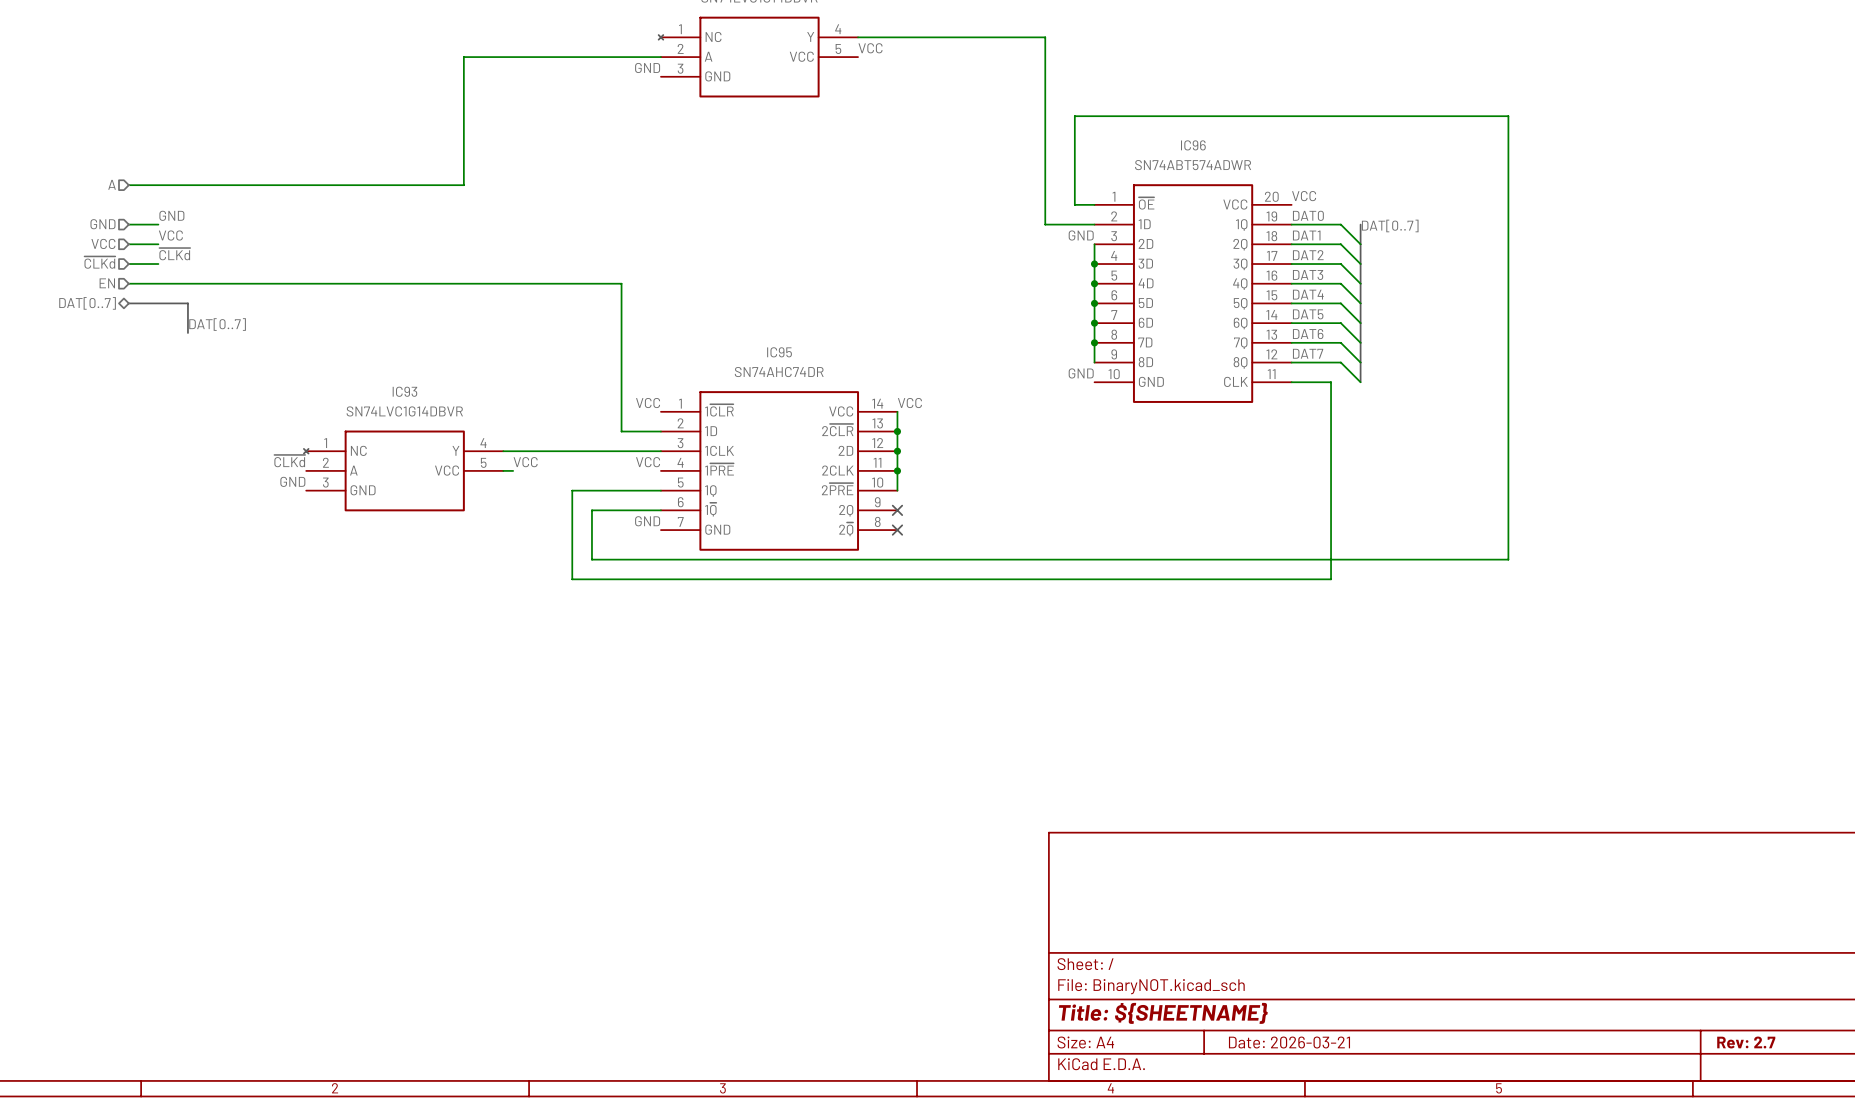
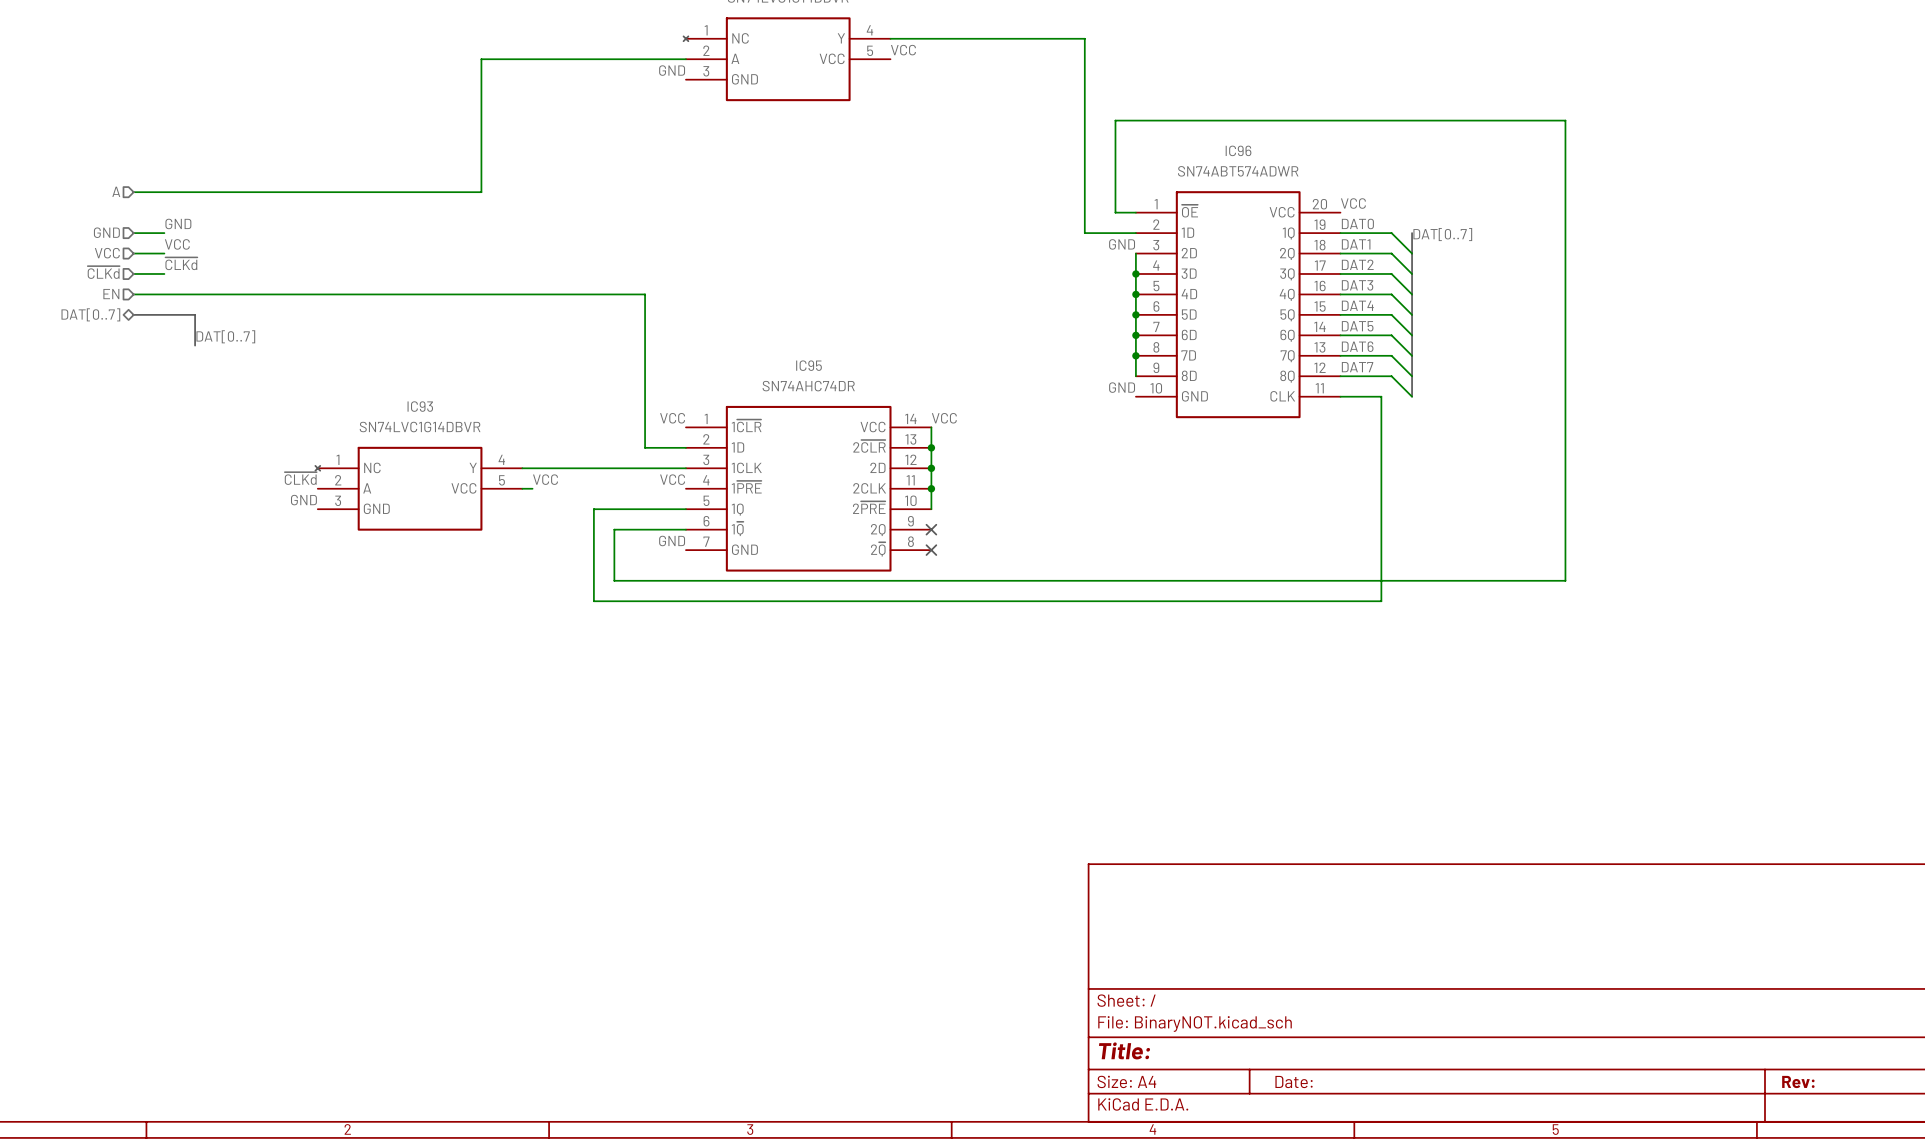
title block: Title: ${SHEETNAME} (1163, 1013) -> Title: (1124, 1050)
title block: Date: 2026-03-21 (1289, 1042) -> Date: (1294, 1082)
title block: Rev: 2.7 (1746, 1042) -> Rev: (1798, 1082)

